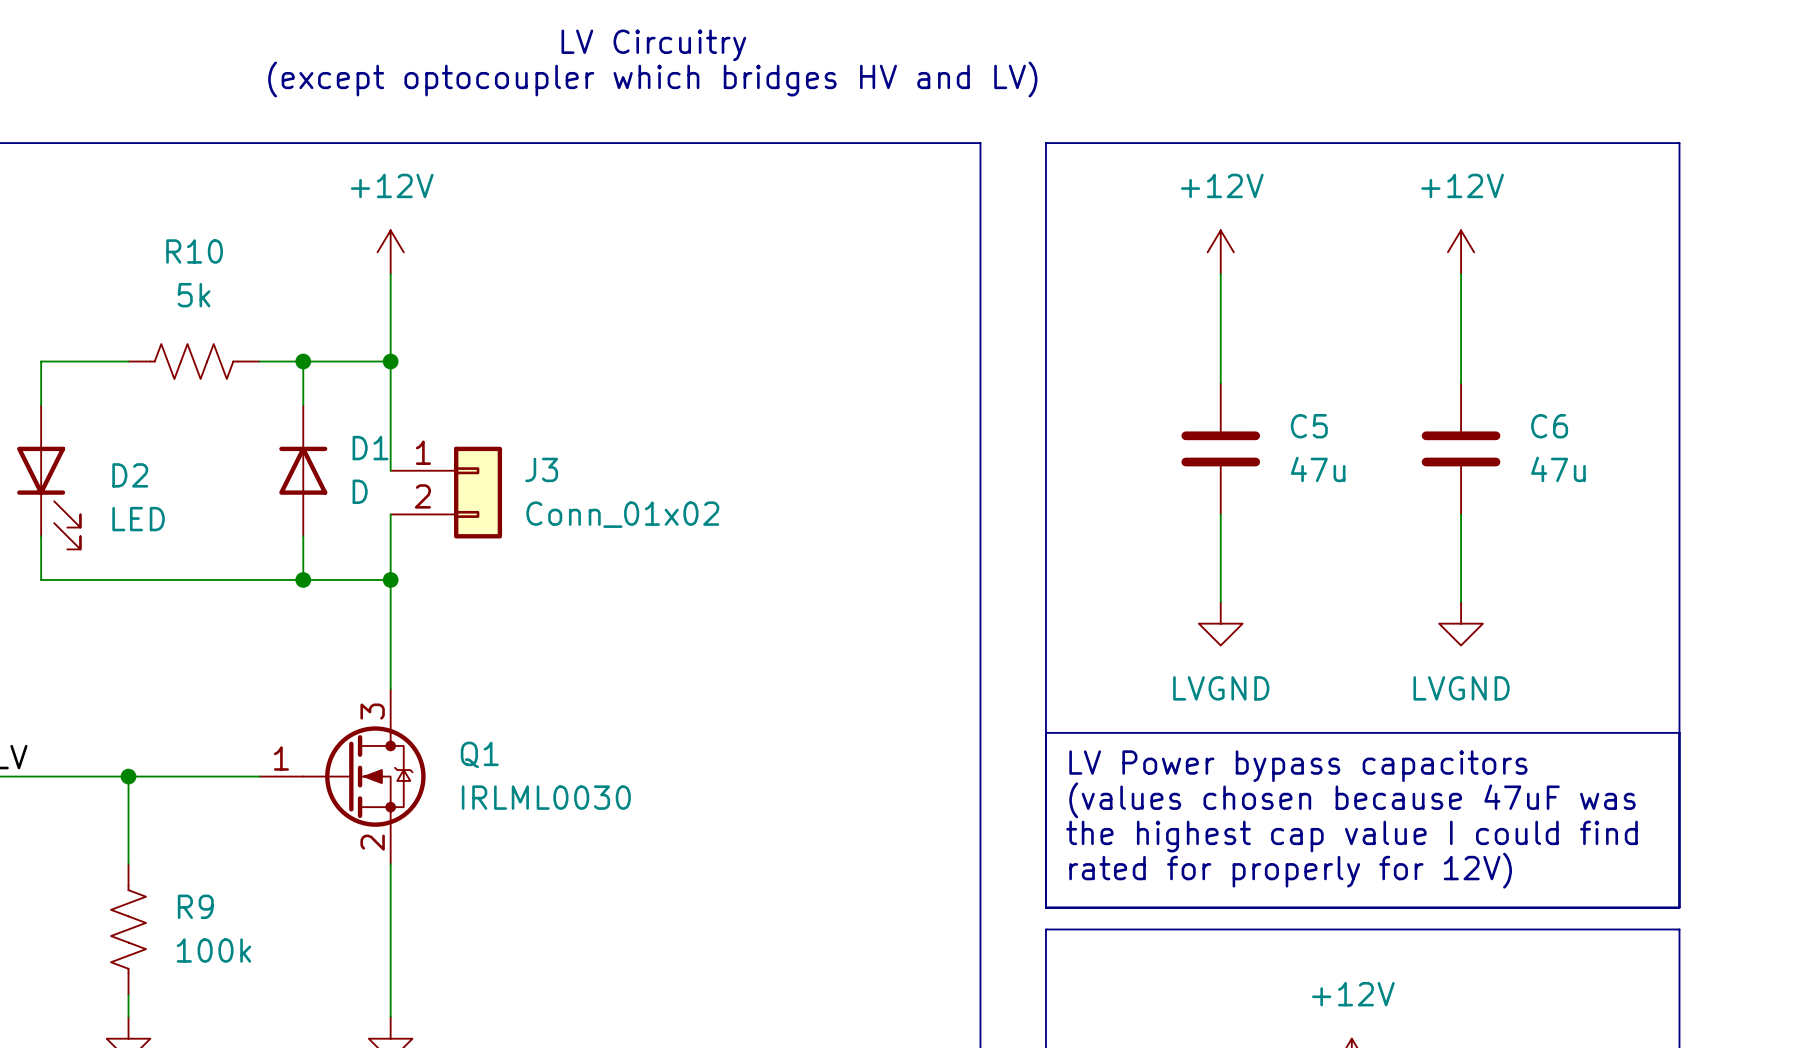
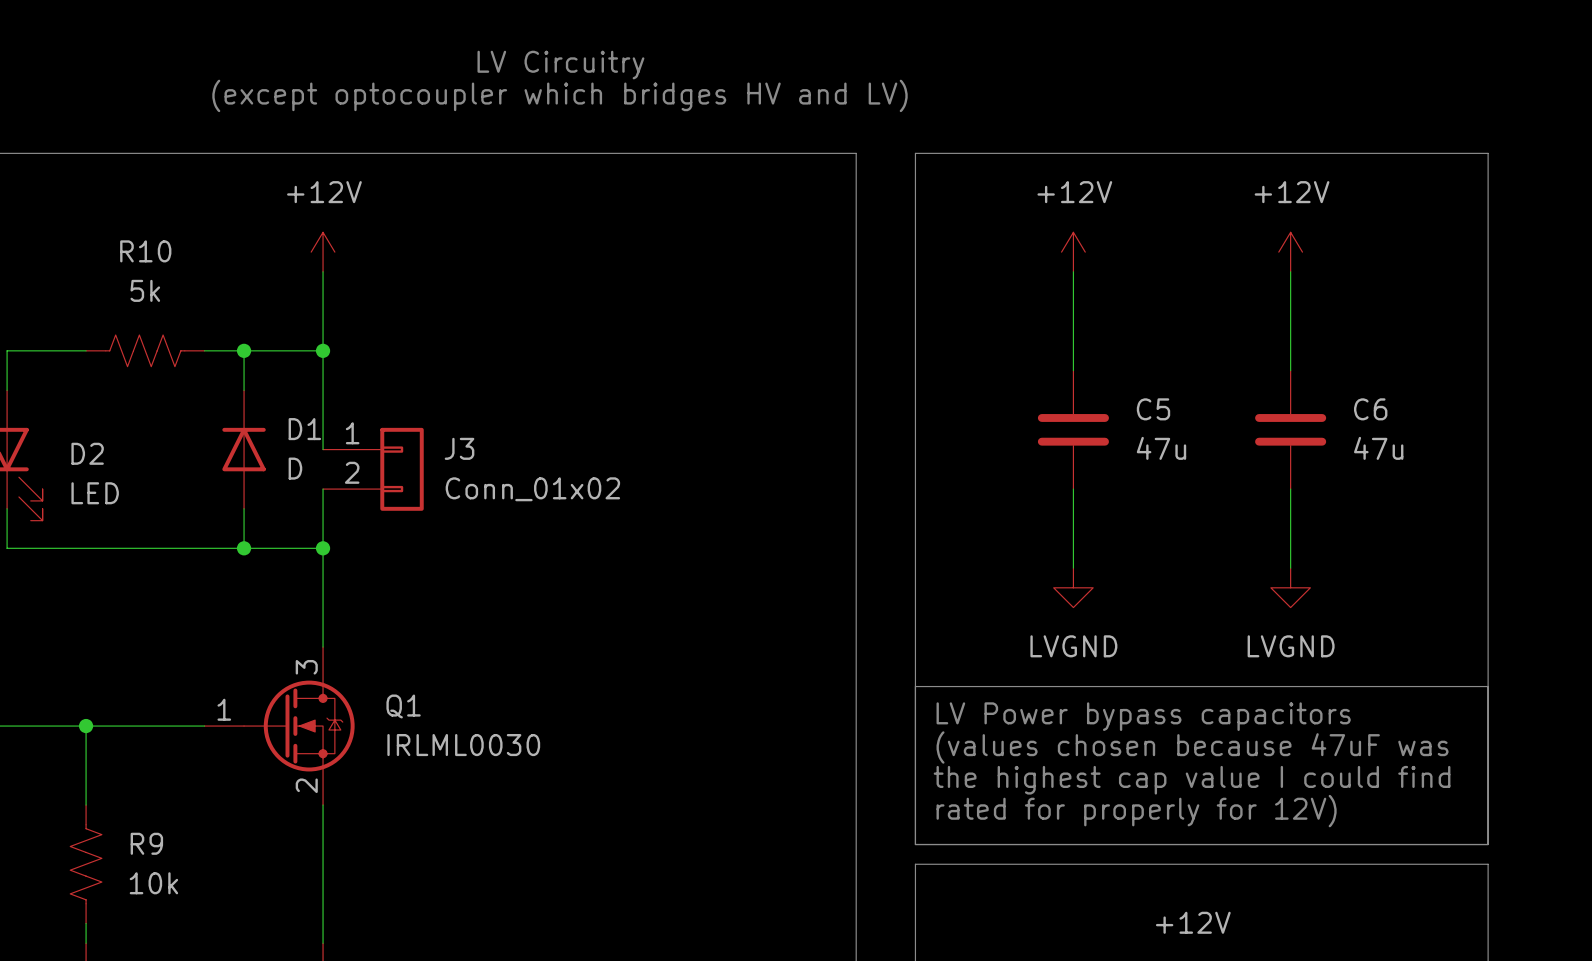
R9 value: 100k (213, 950) -> 10k (153, 883)

